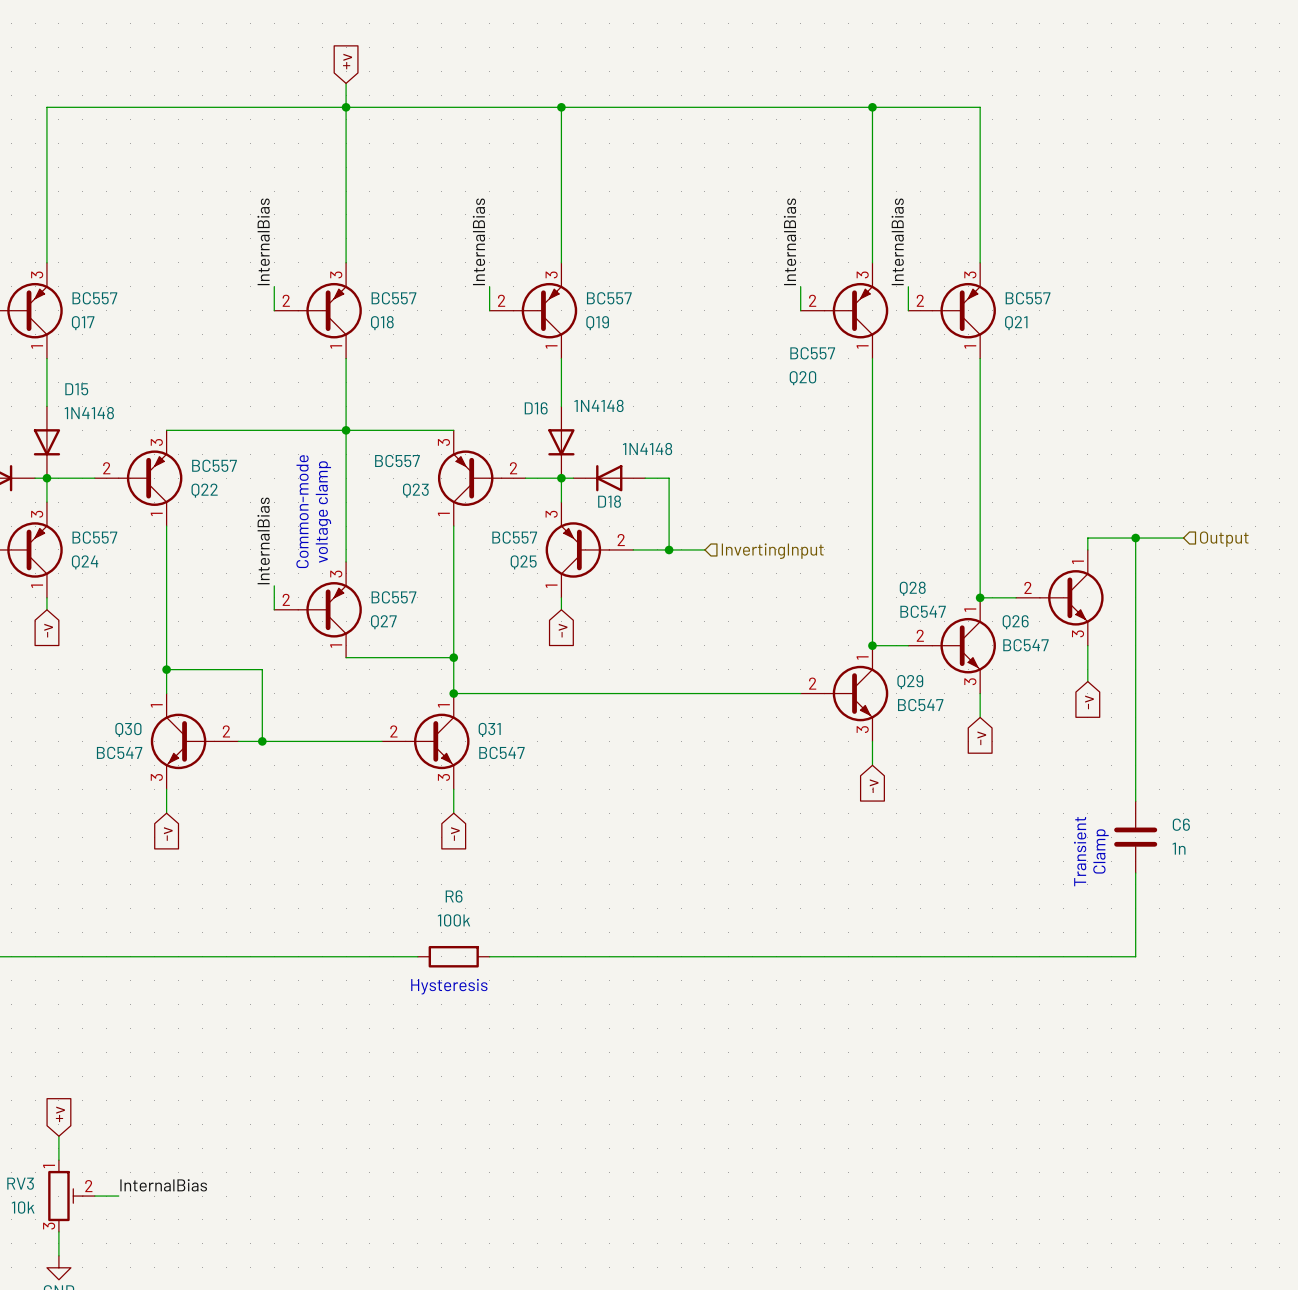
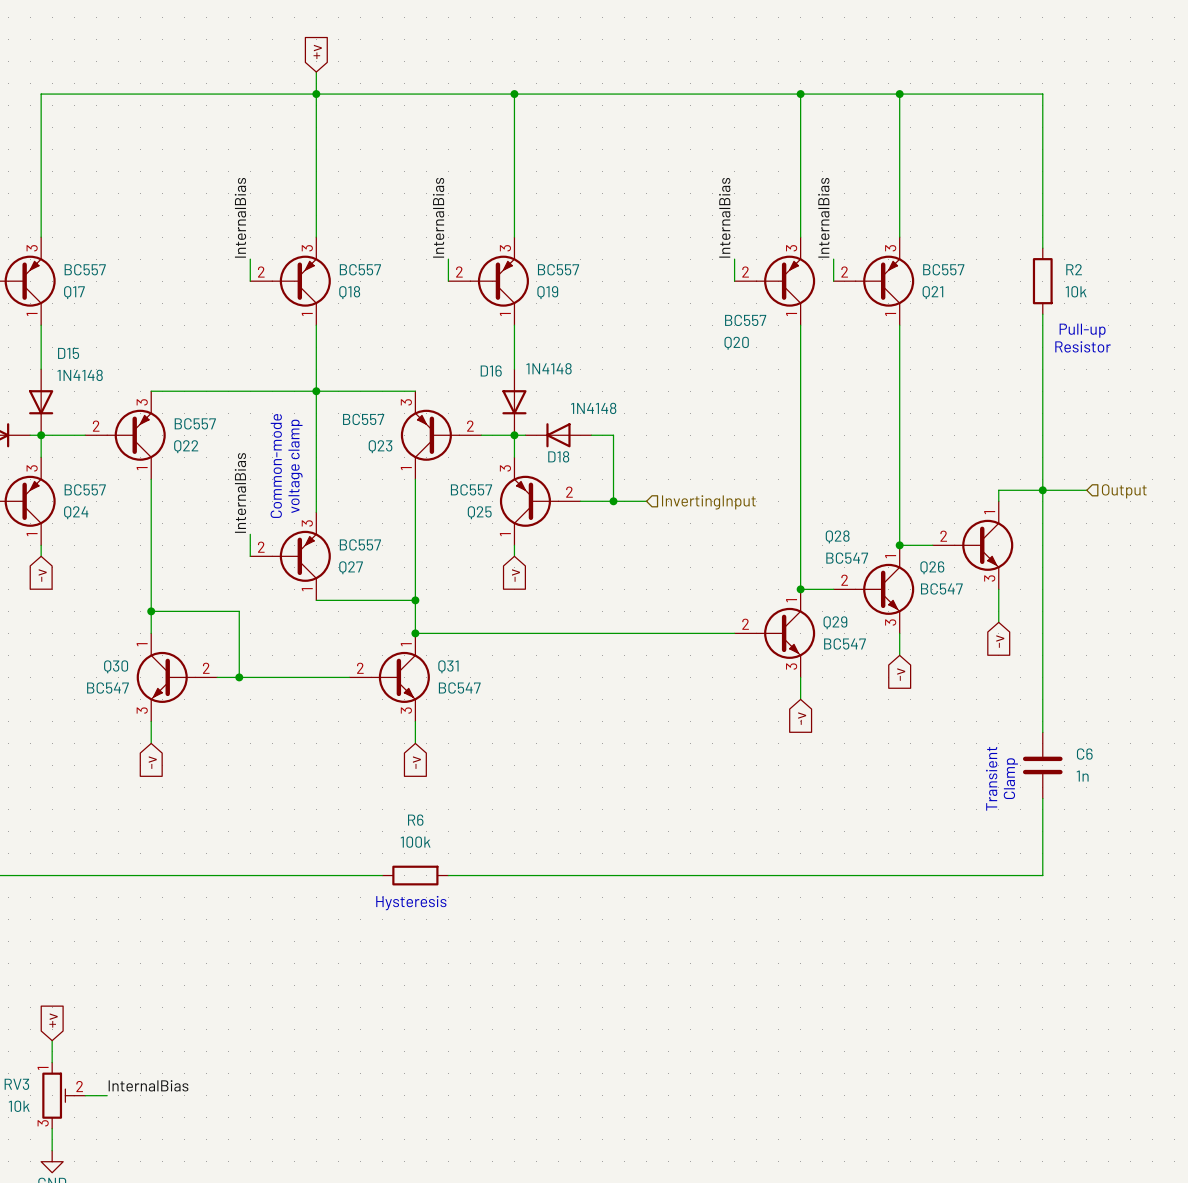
wire: none -> (899, 94) (1042, 94) (1042, 248)
junction: none -> (899, 94)
R2: none -> 10k (1042, 281)
wire: none -> (1042, 314) (1042, 490)
text: none -> Pull-up (1082, 330)
text: none -> Resistor (1083, 346)

